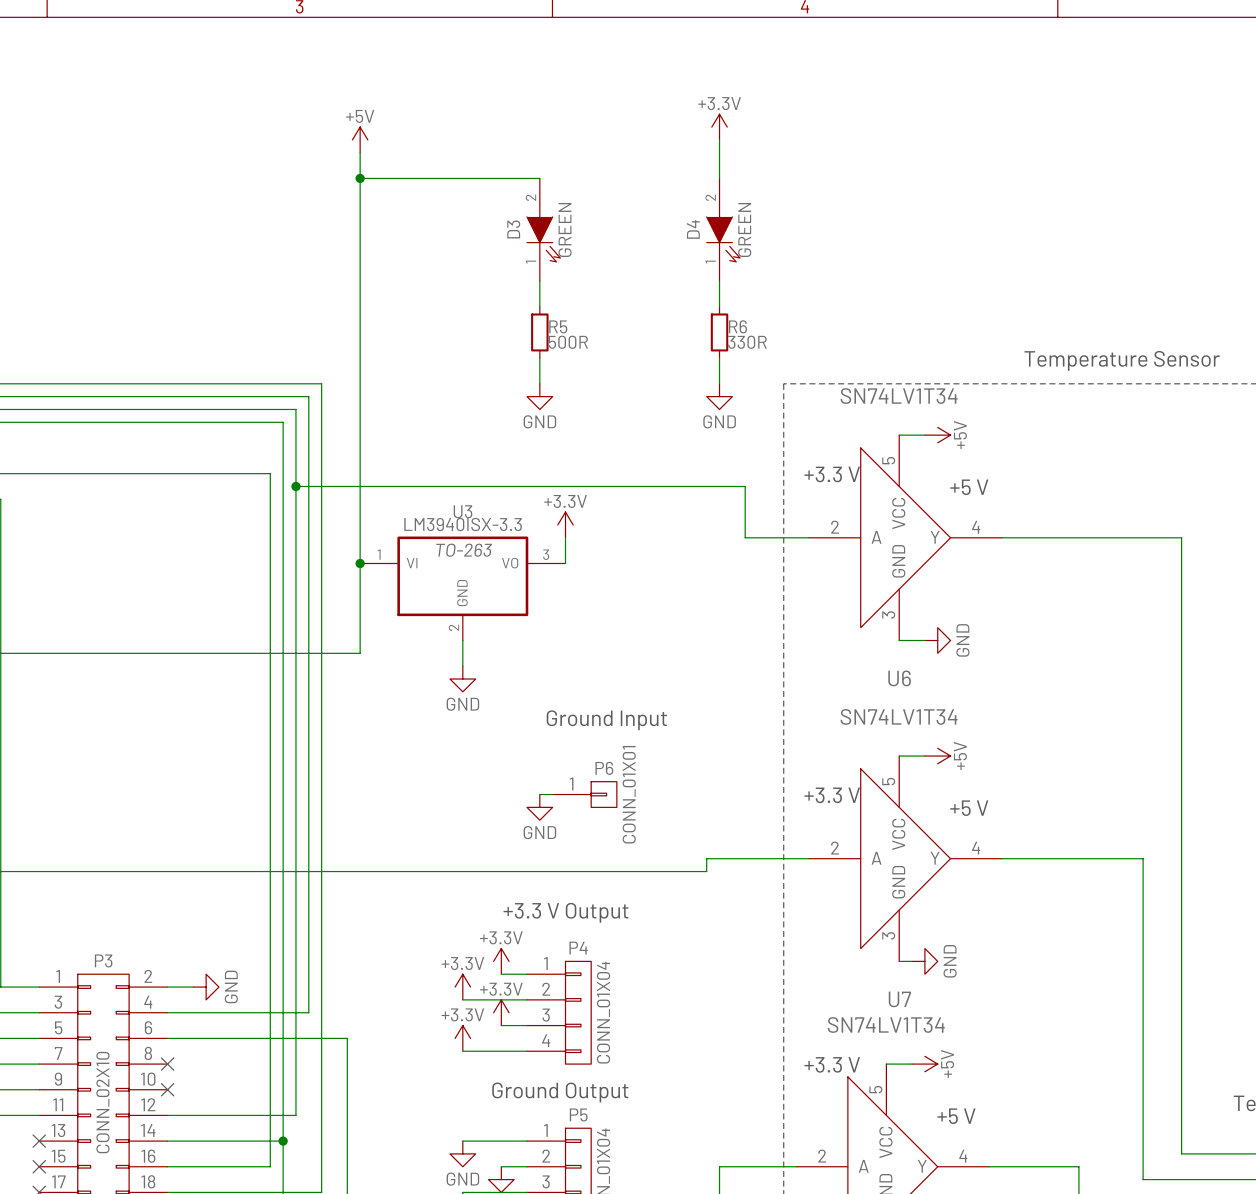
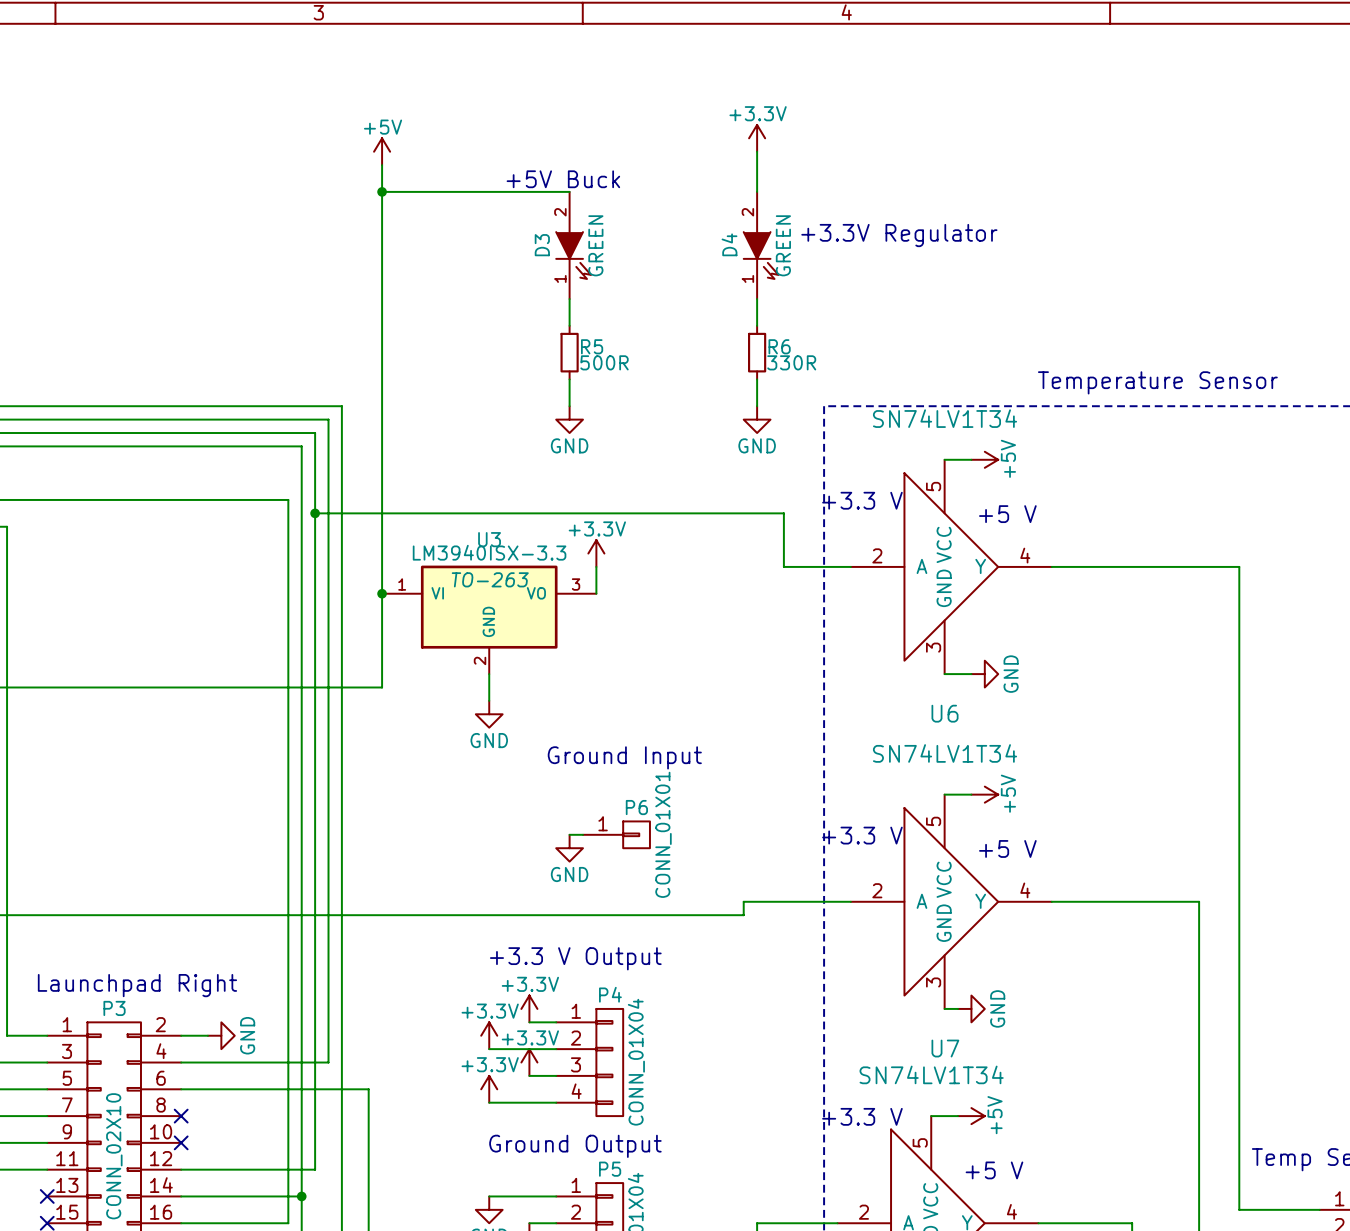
text: none -> +5V Buck (563, 179)
text: none -> +3.3V Regulator (899, 235)
text: none -> Launchpad Right (137, 985)

